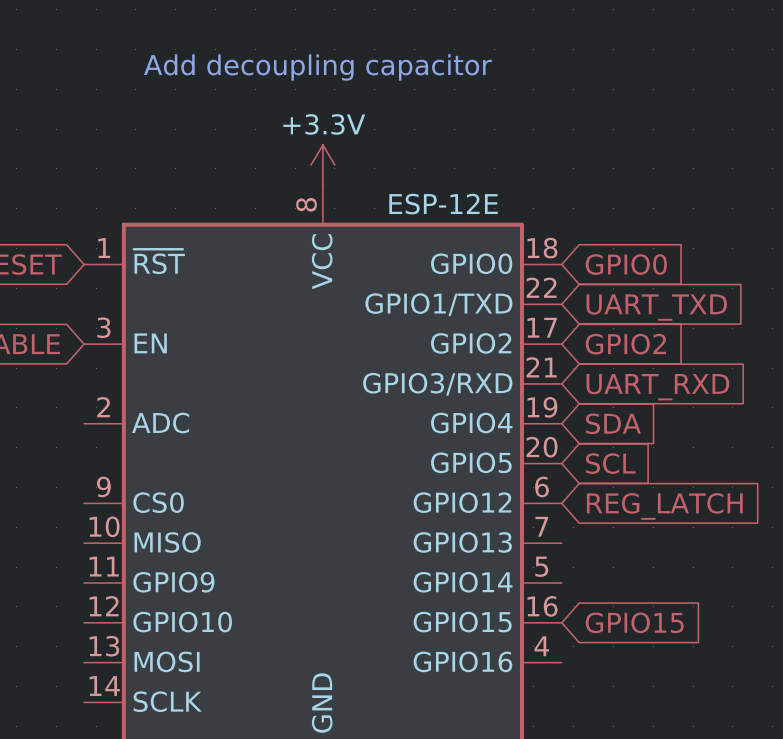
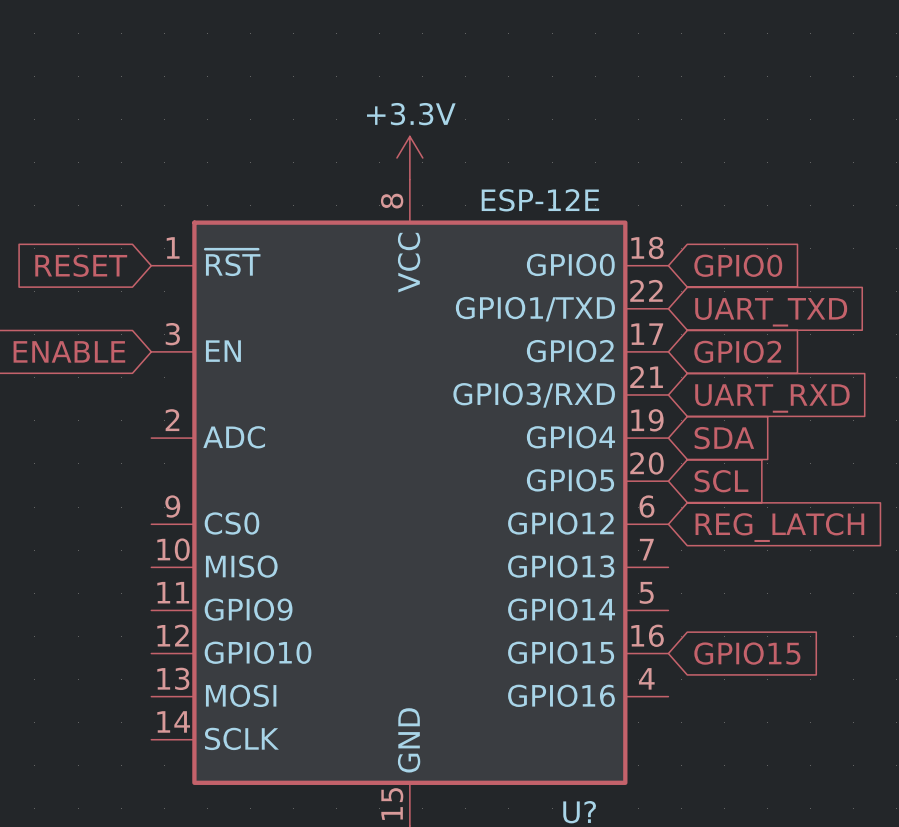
text: Add decoupling capacitor (317, 67) -> none

